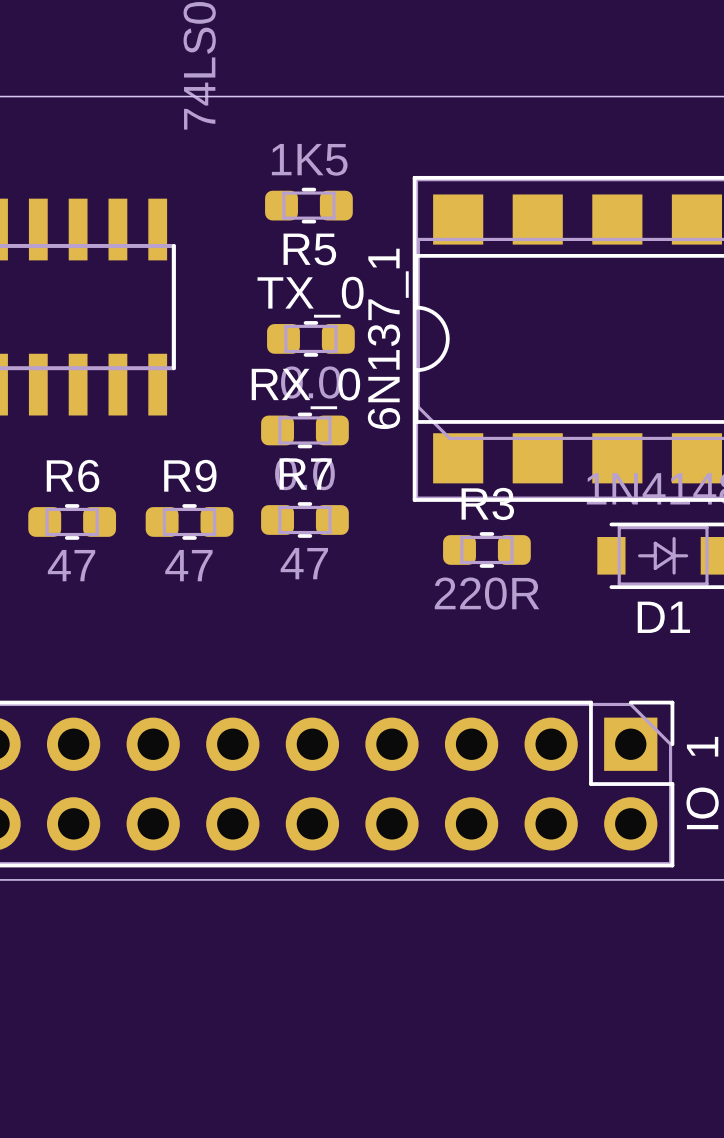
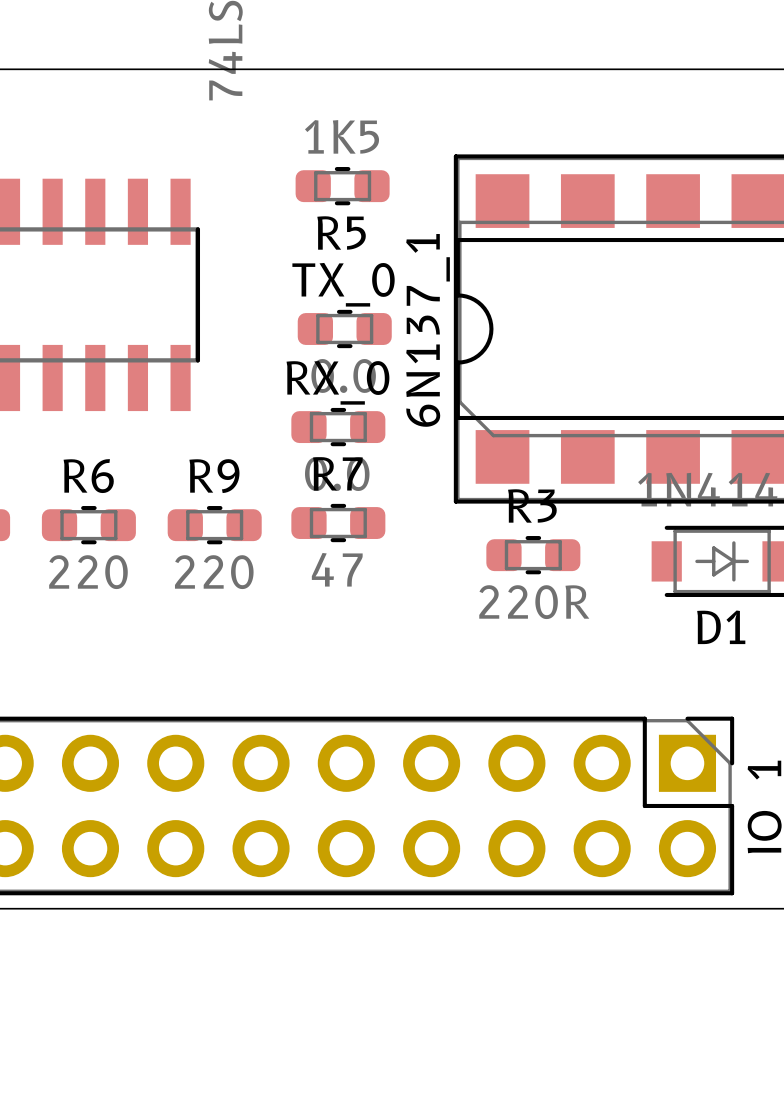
R6 value: 47 (71, 565) -> 220 (88, 572)
R9 value: 47 (188, 565) -> 220 (214, 572)

